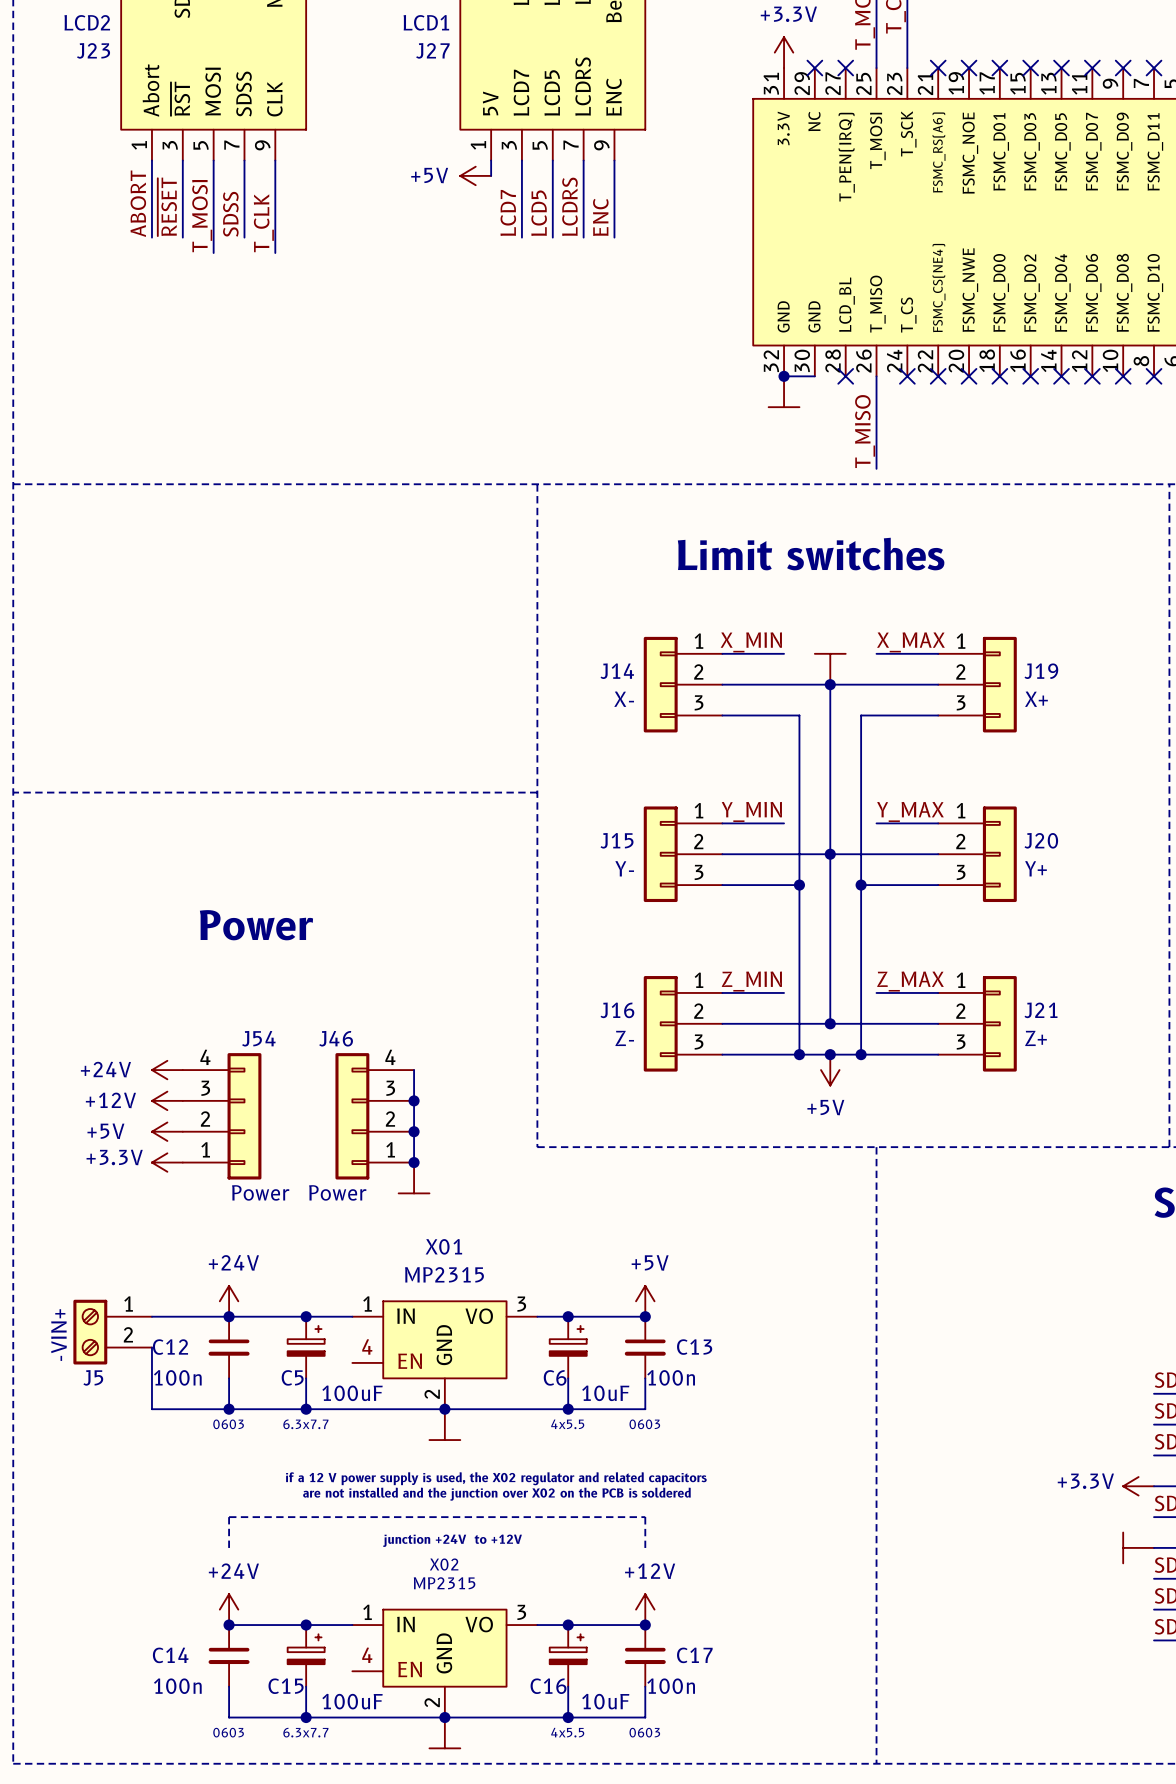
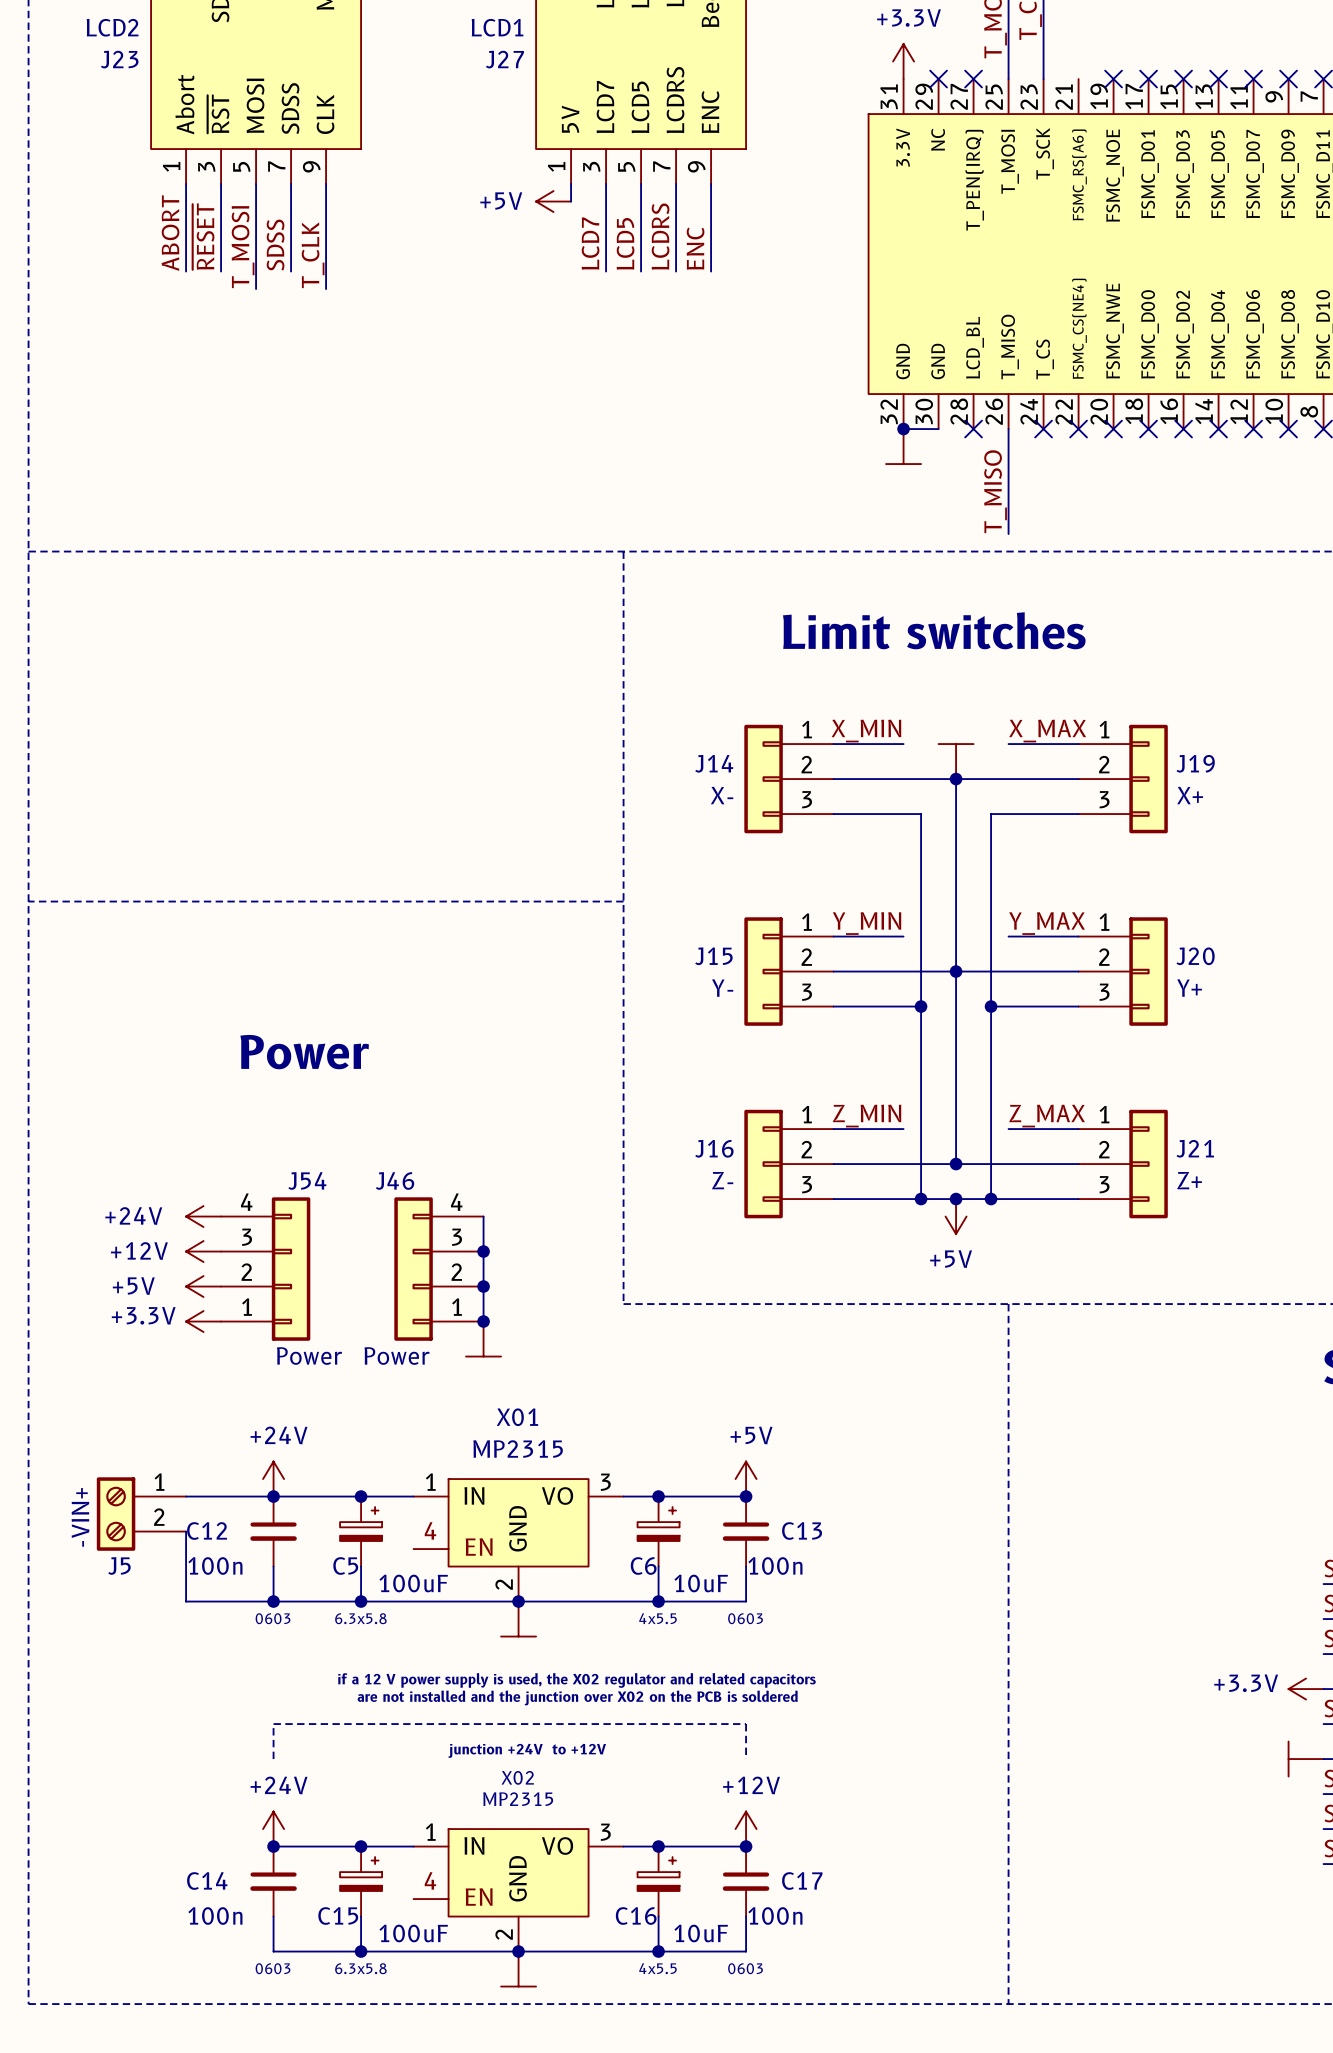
no-connect mark: (938, 68) -> none
C5 text: 6.3x7.7 (305, 1424) -> 6.3x5.8 (360, 1618)
C15 text: 6.3x7.7 (305, 1732) -> 6.3x5.8 (360, 1968)

